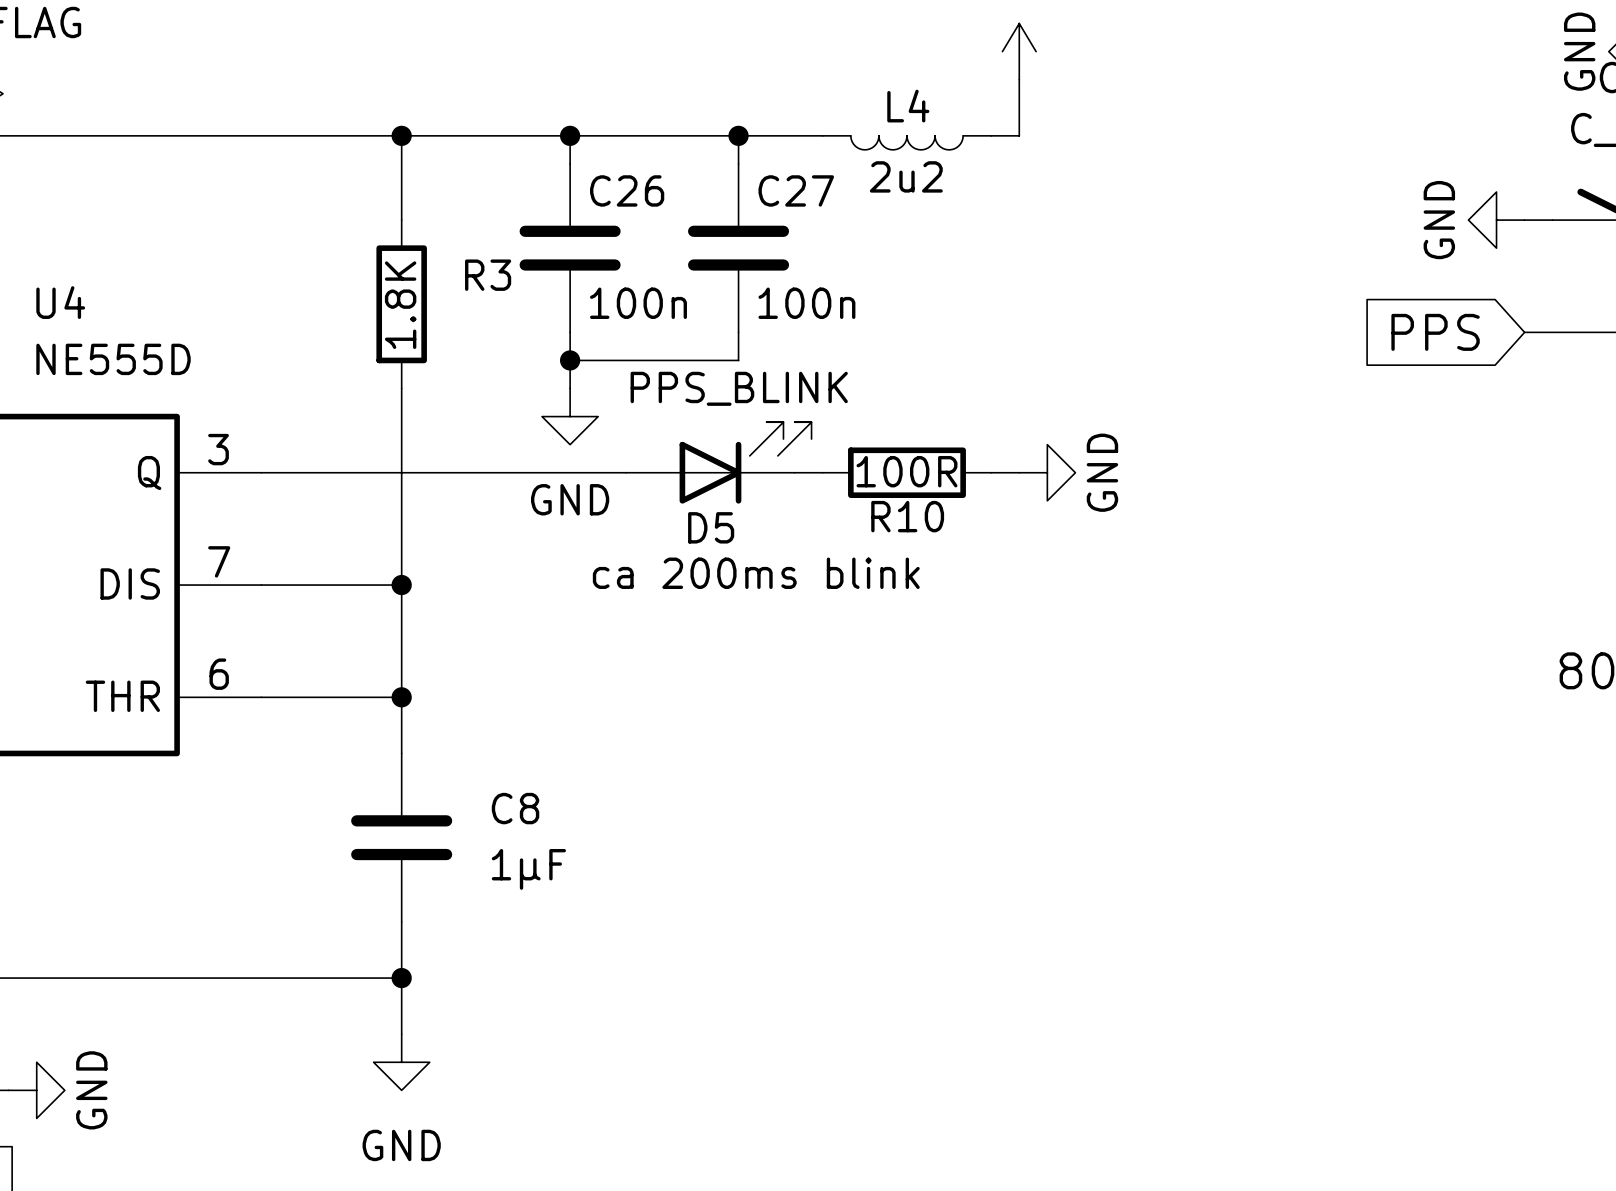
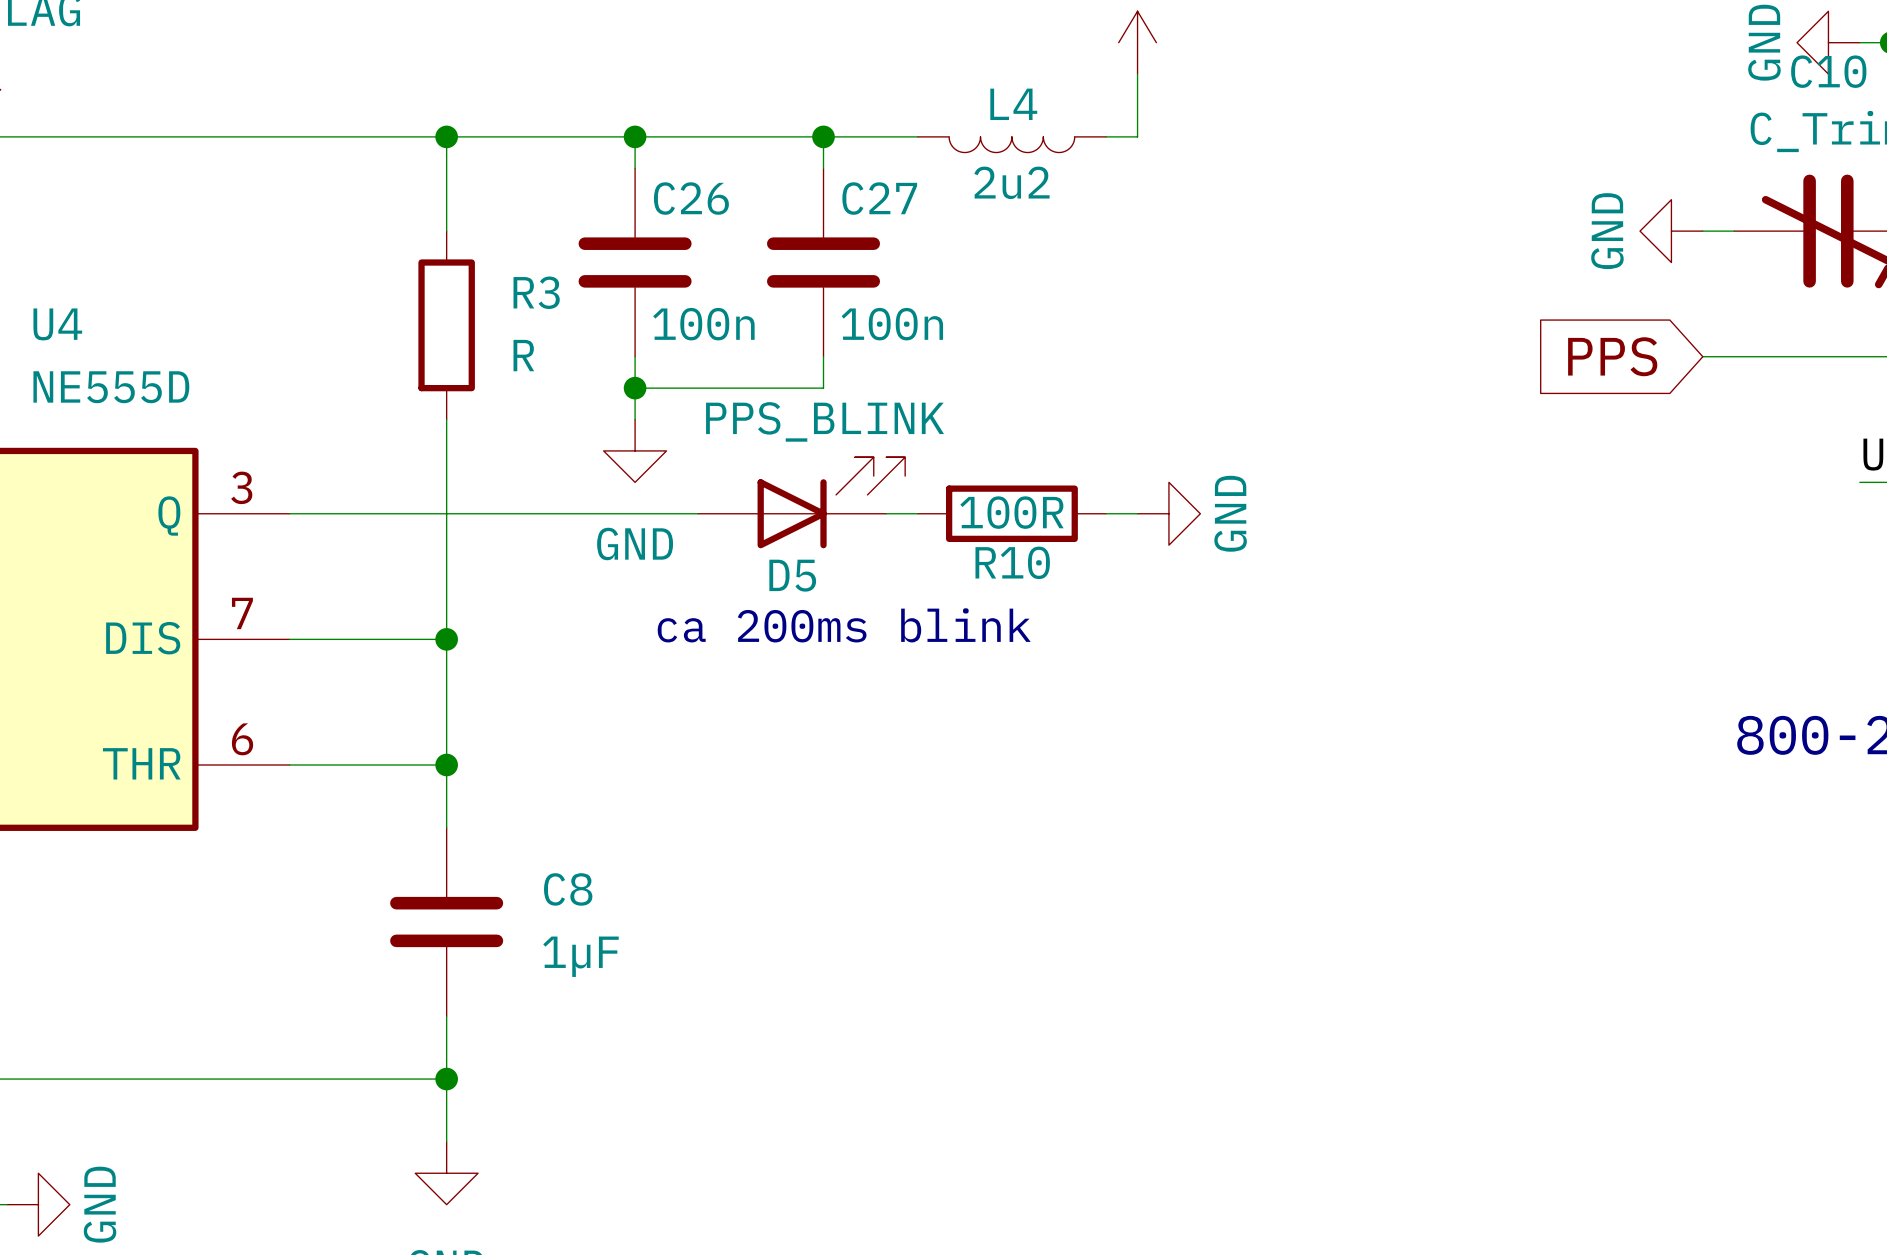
R3 value: 1.8K (400, 305) -> R (523, 355)

